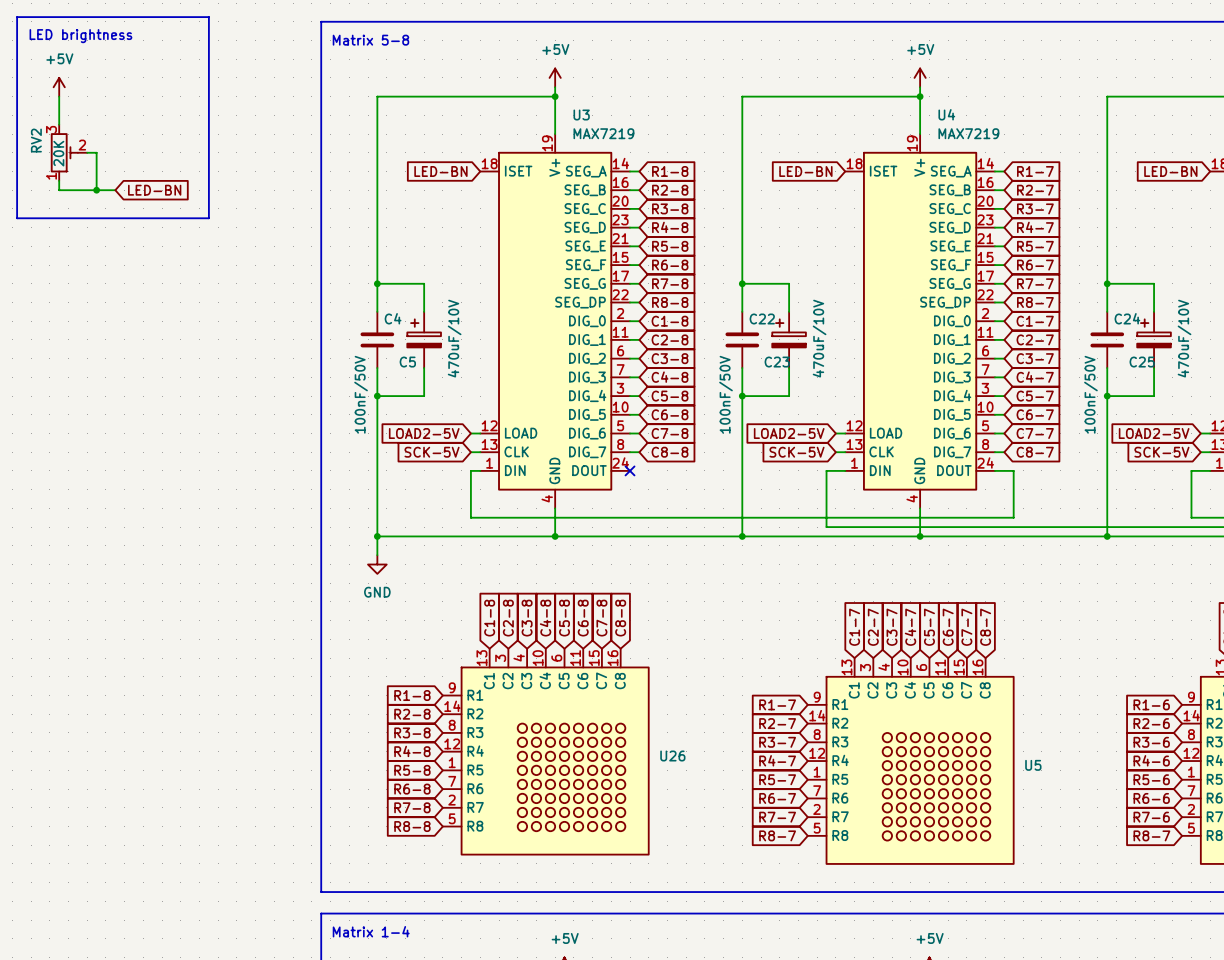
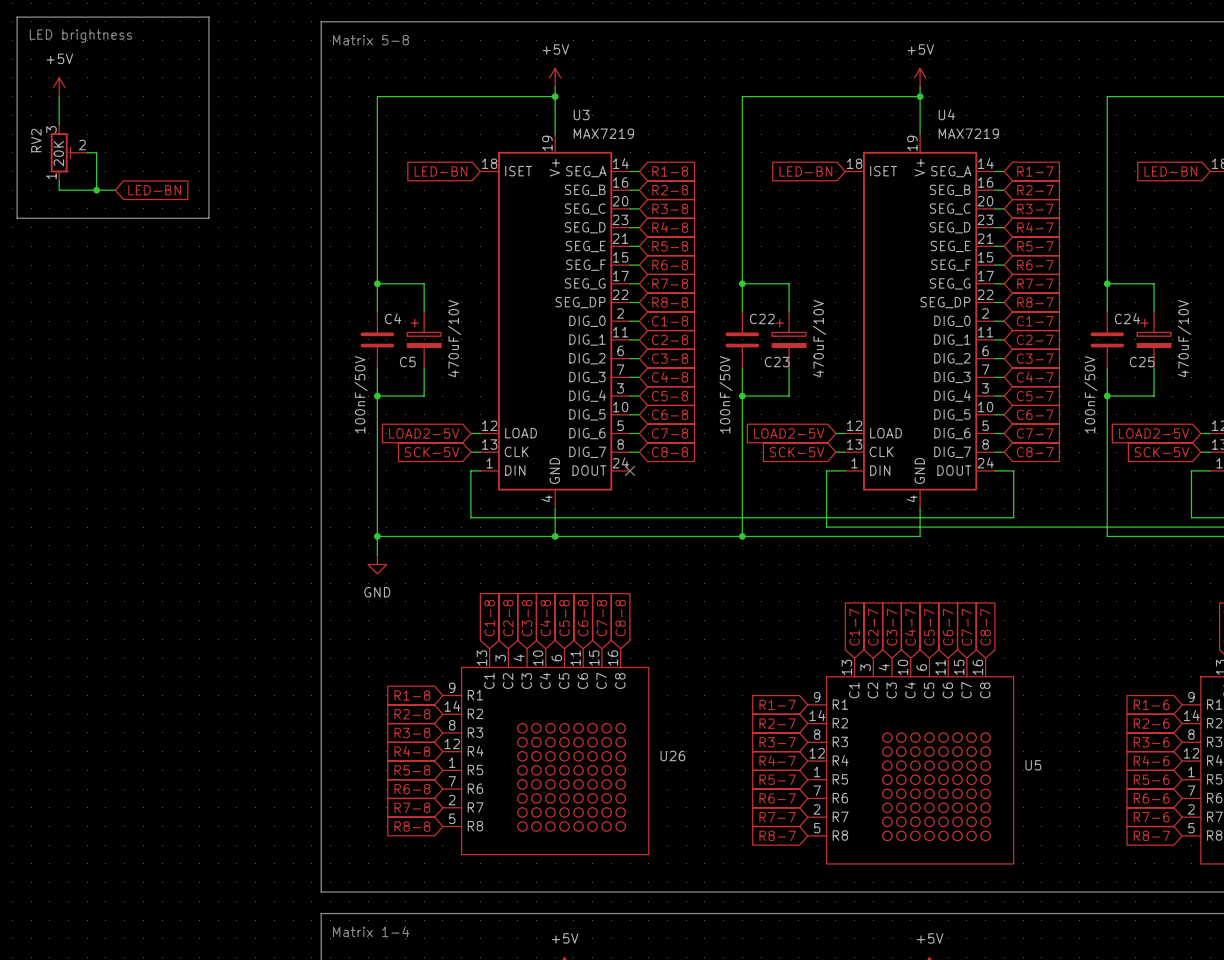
wire: (920, 536) (1107, 536) -> none
junction: (920, 536) -> none
junction: (1107, 536) -> none

